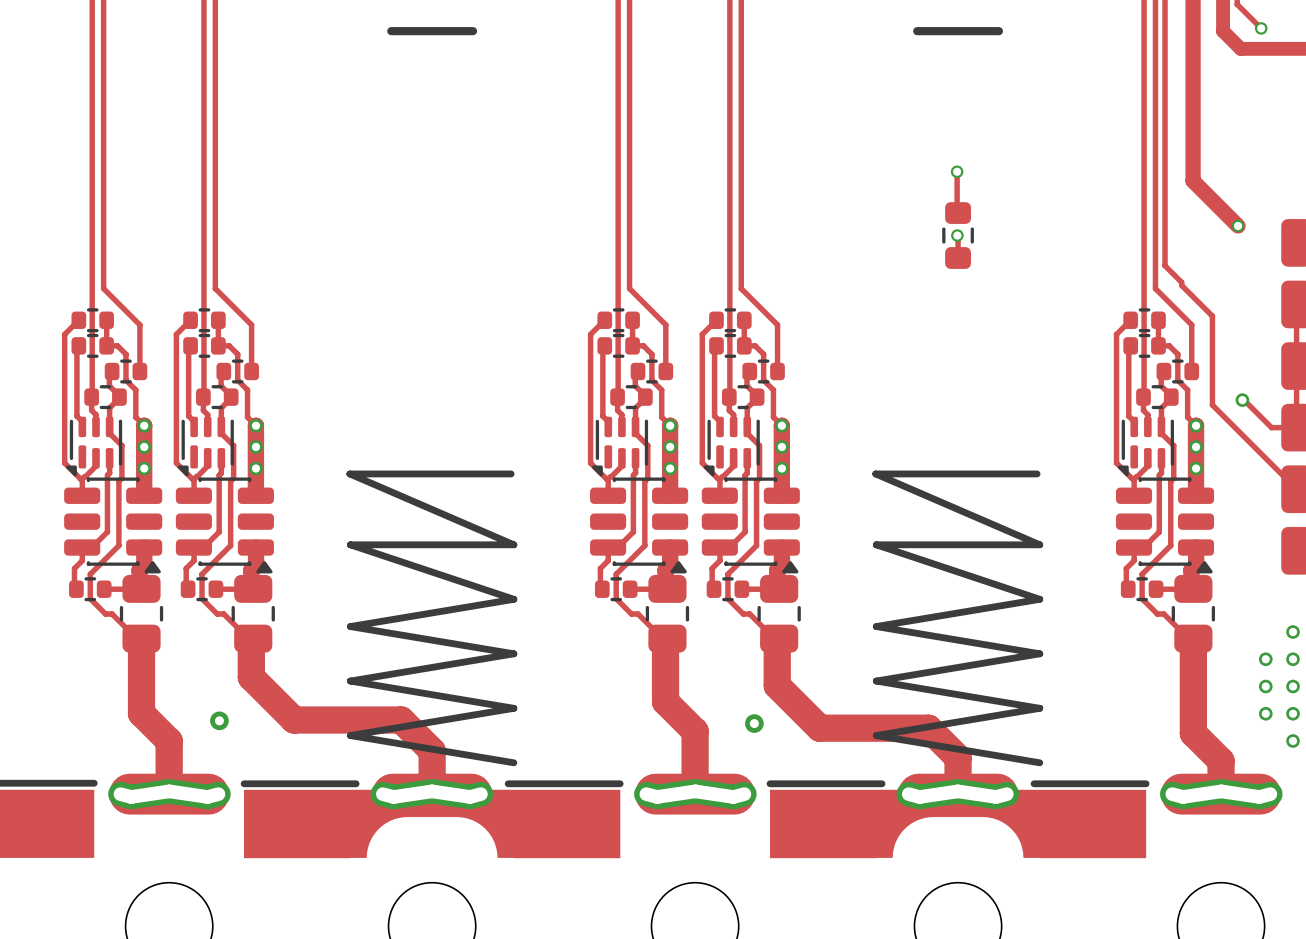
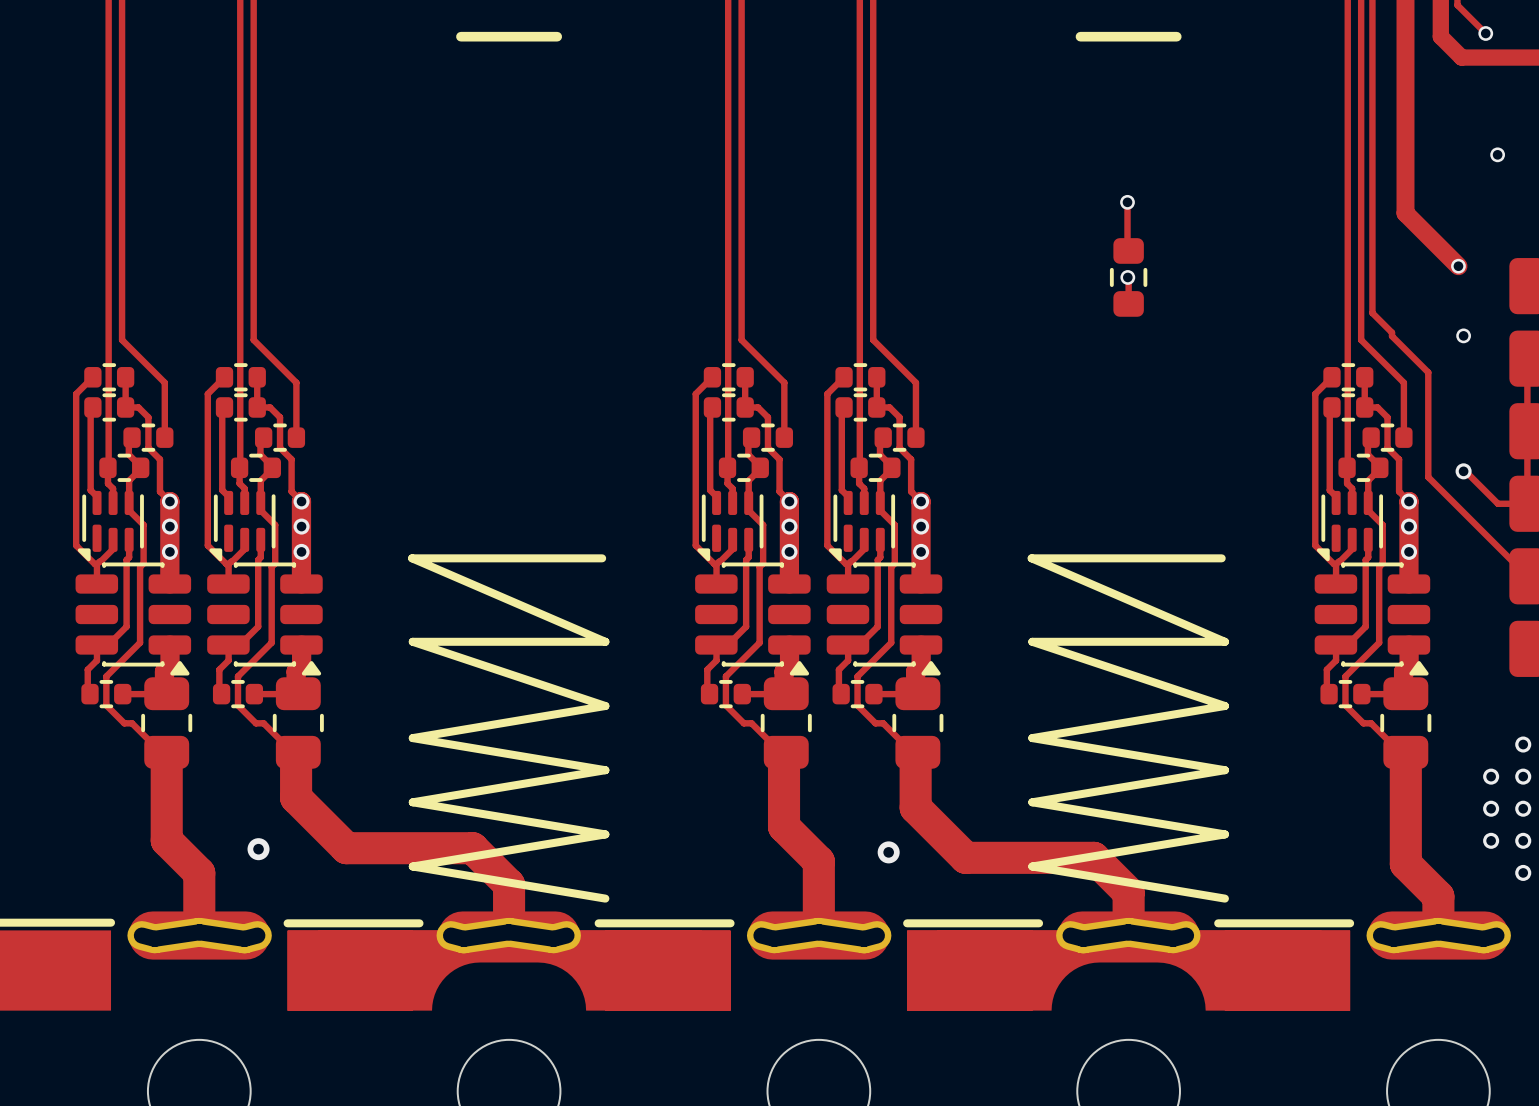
via: none -> (1497, 154)
via: none -> (1463, 335)

